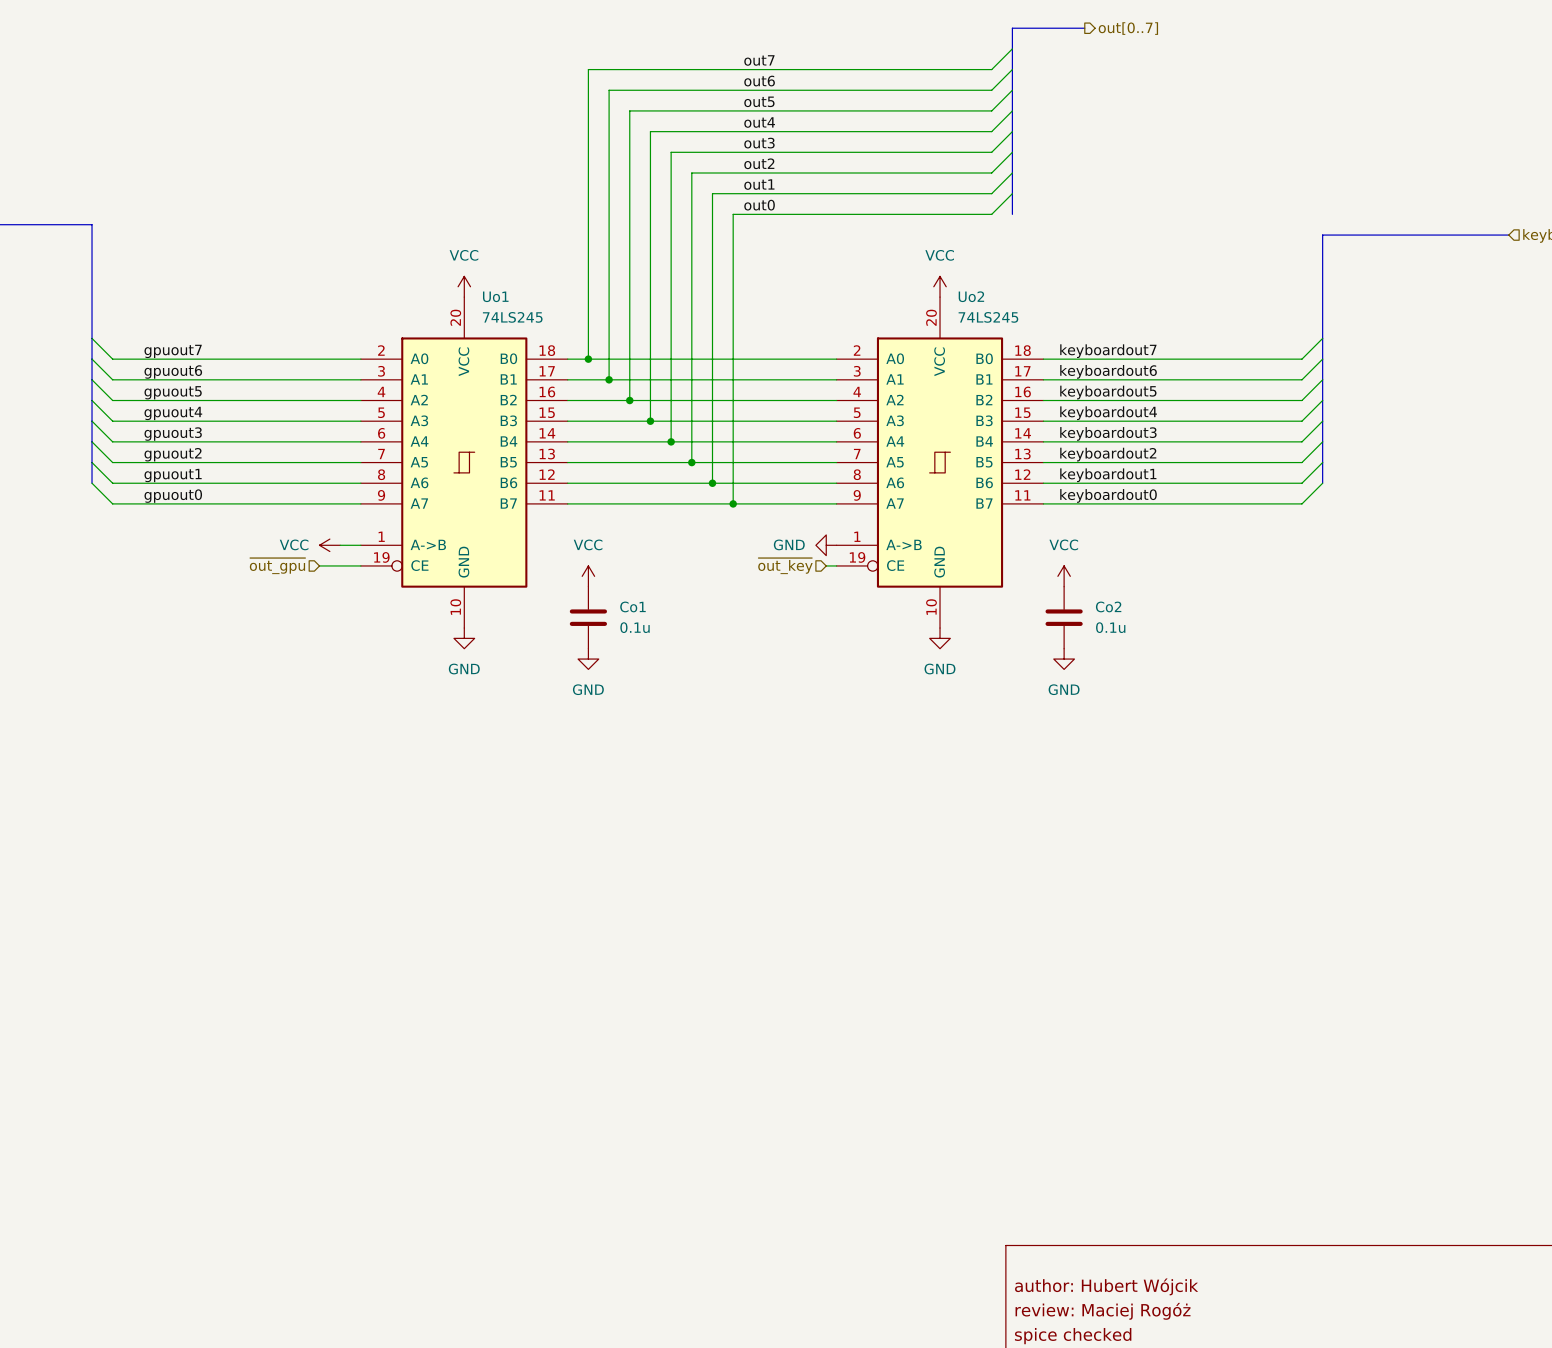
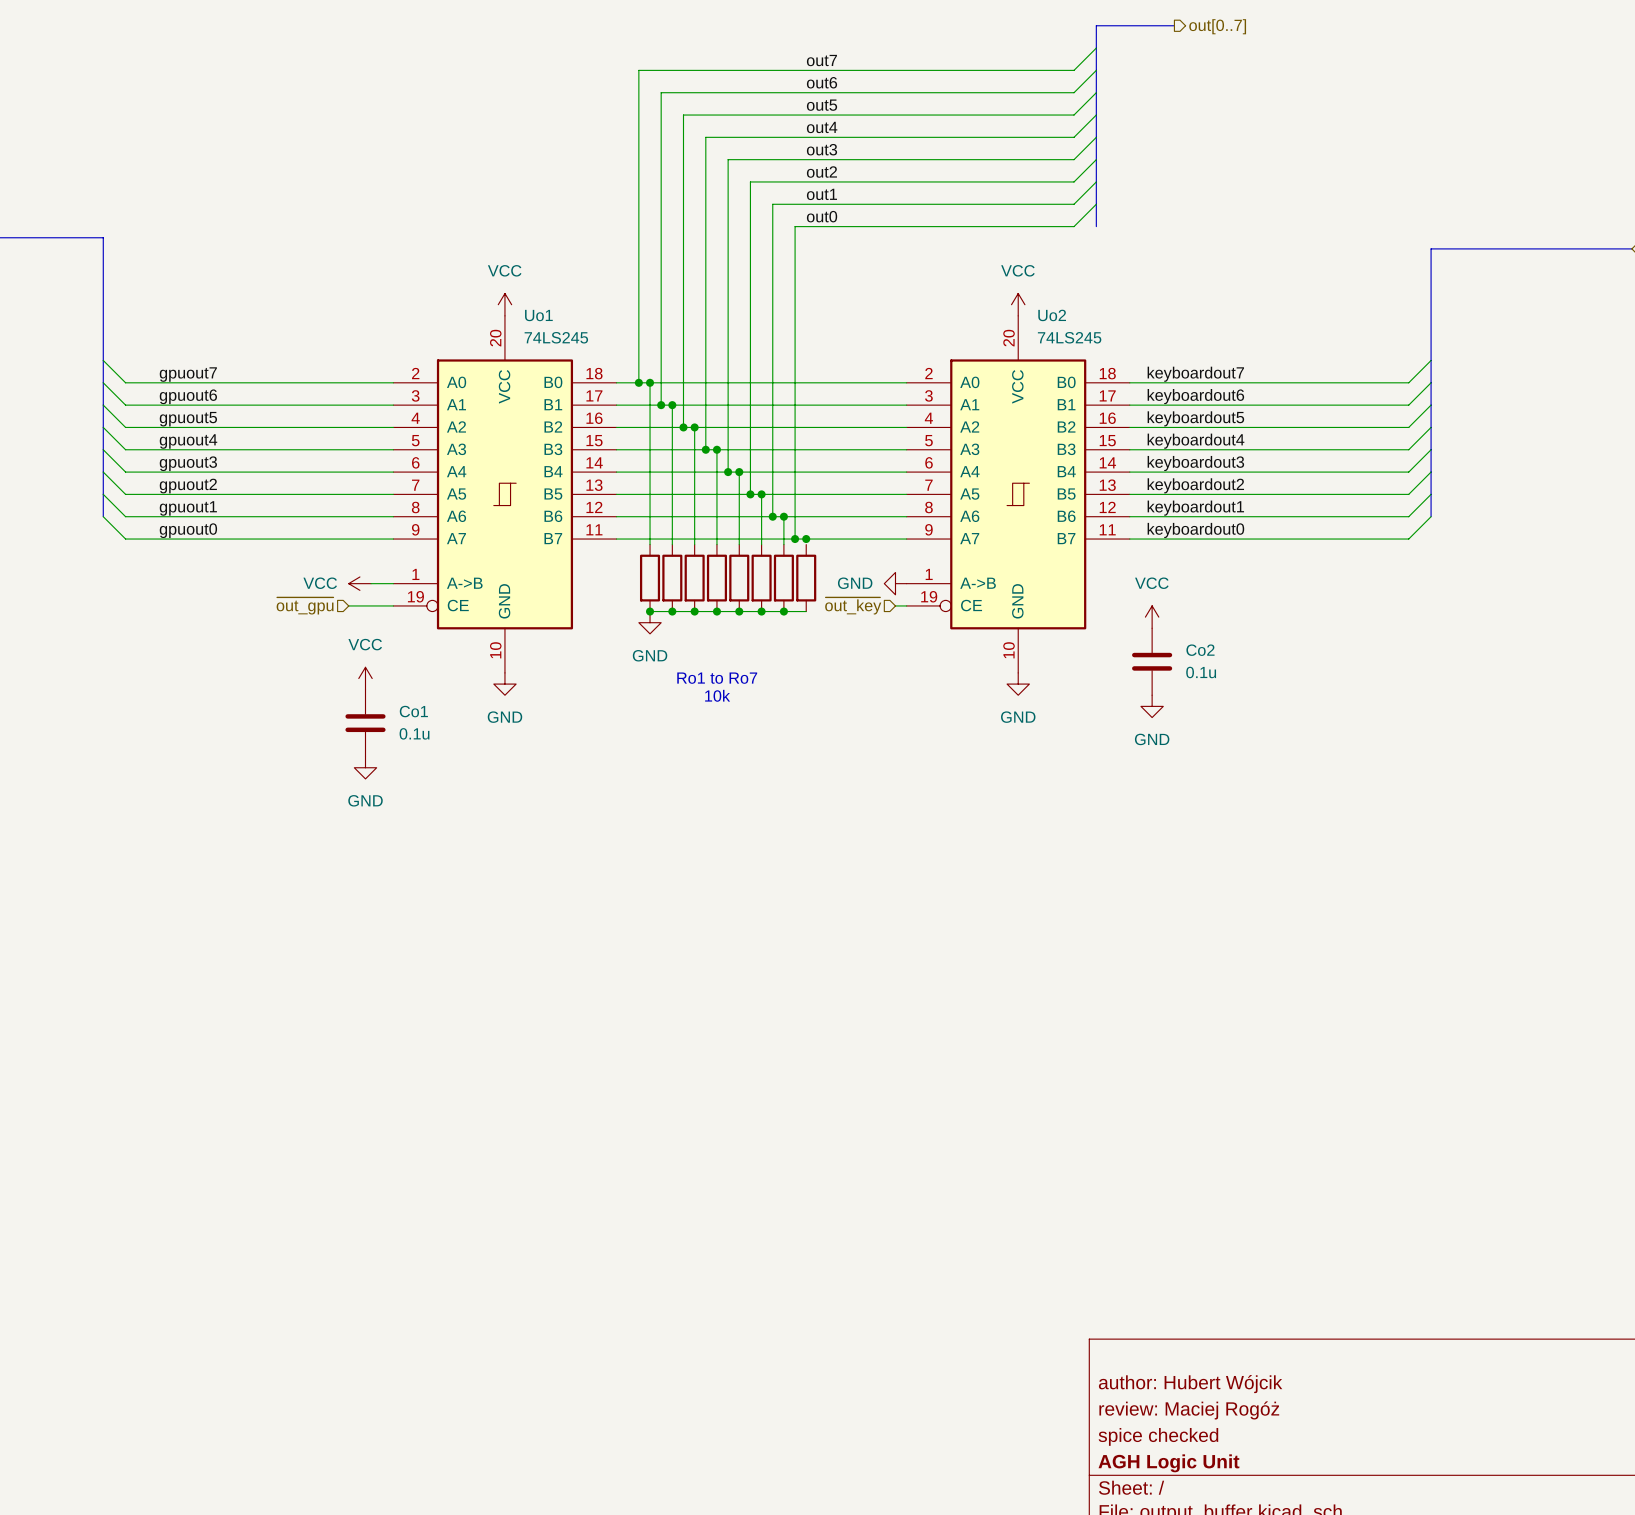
wire: none -> (650, 382) (650, 544)
junction: none -> (650, 382)
wire: none -> (672, 405) (672, 544)
junction: none -> (672, 405)
wire: none -> (694, 427) (694, 544)
junction: none -> (694, 427)
wire: none -> (716, 449) (716, 544)
junction: none -> (716, 449)
wire: none -> (739, 472) (739, 544)
junction: none -> (739, 472)
wire: none -> (761, 494) (761, 544)
junction: none -> (761, 494)
wire: none -> (783, 516) (783, 544)
junction: none -> (783, 516)
junction: none -> (806, 539)
part: none -> (650, 578)
part: none -> (672, 578)
part: none -> (694, 578)
part: none -> (716, 578)
part: none -> (739, 578)
part: none -> (761, 578)
part: none -> (783, 578)
part: none -> (806, 578)
wire: none -> (650, 611) (806, 611)
junction: none -> (650, 611)
junction: none -> (672, 611)
junction: none -> (694, 611)
junction: none -> (716, 611)
junction: none -> (739, 611)
junction: none -> (761, 611)
junction: none -> (783, 611)
power symbol: VCC (588, 576) -> none
Co1 position: (588, 617) -> (365, 723)
text: none -> Ro1 to Ro7 (717, 678)
power symbol: none -> VCC (365, 678)
text: none -> 10k (717, 695)
power symbol position: GND (588, 659) -> GND (650, 622)
power symbol: none -> GND (365, 767)

